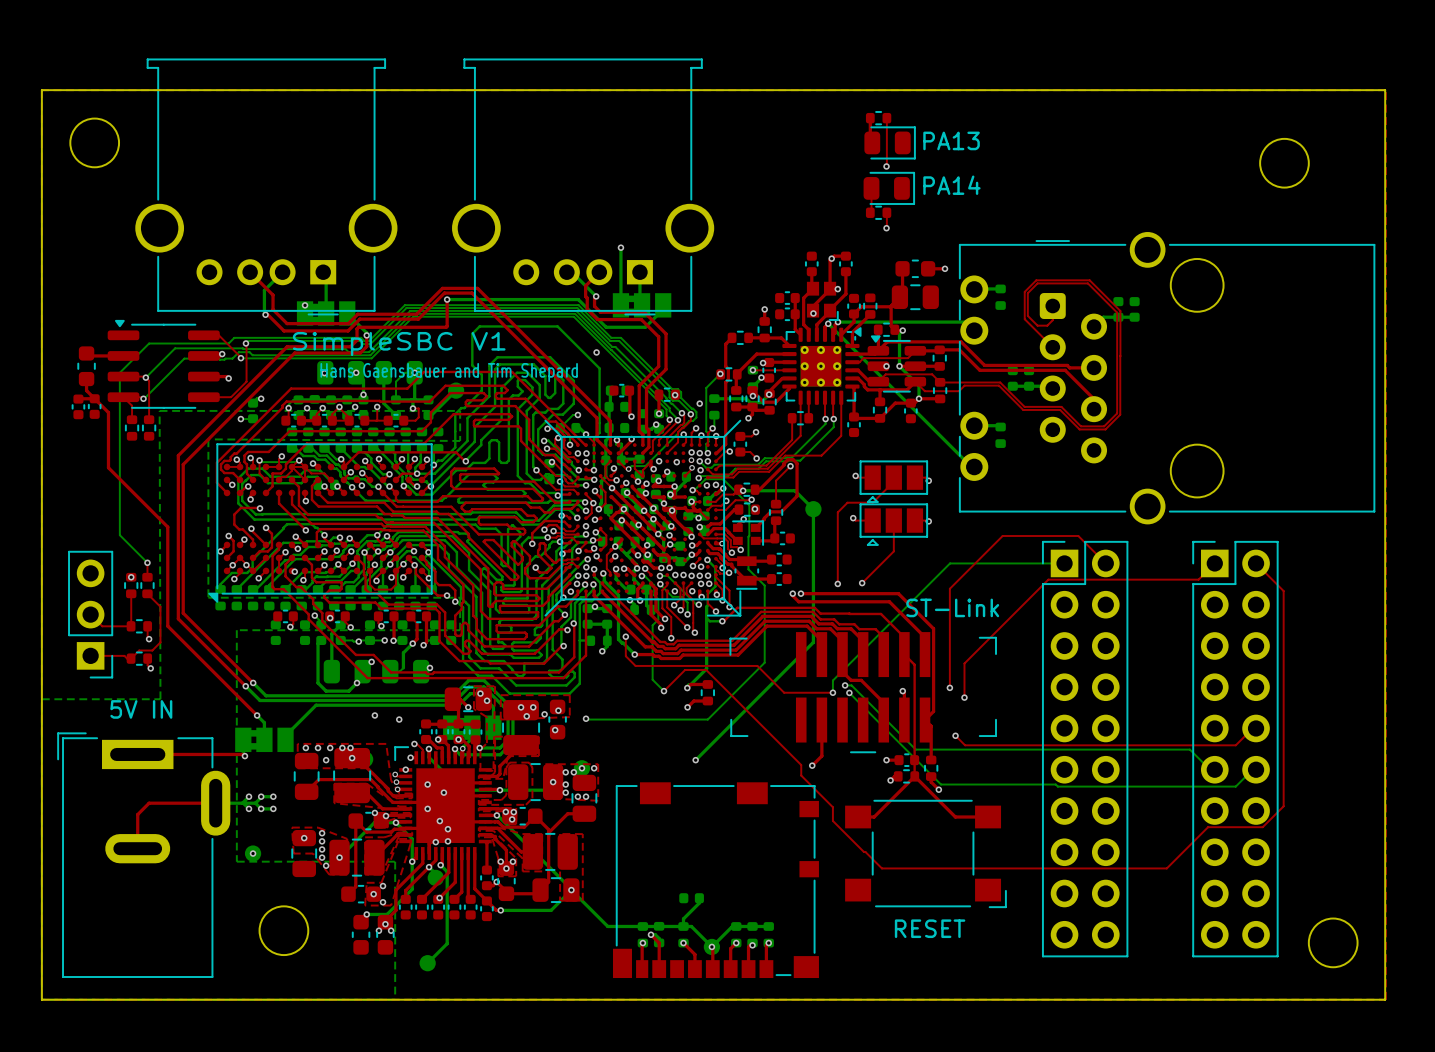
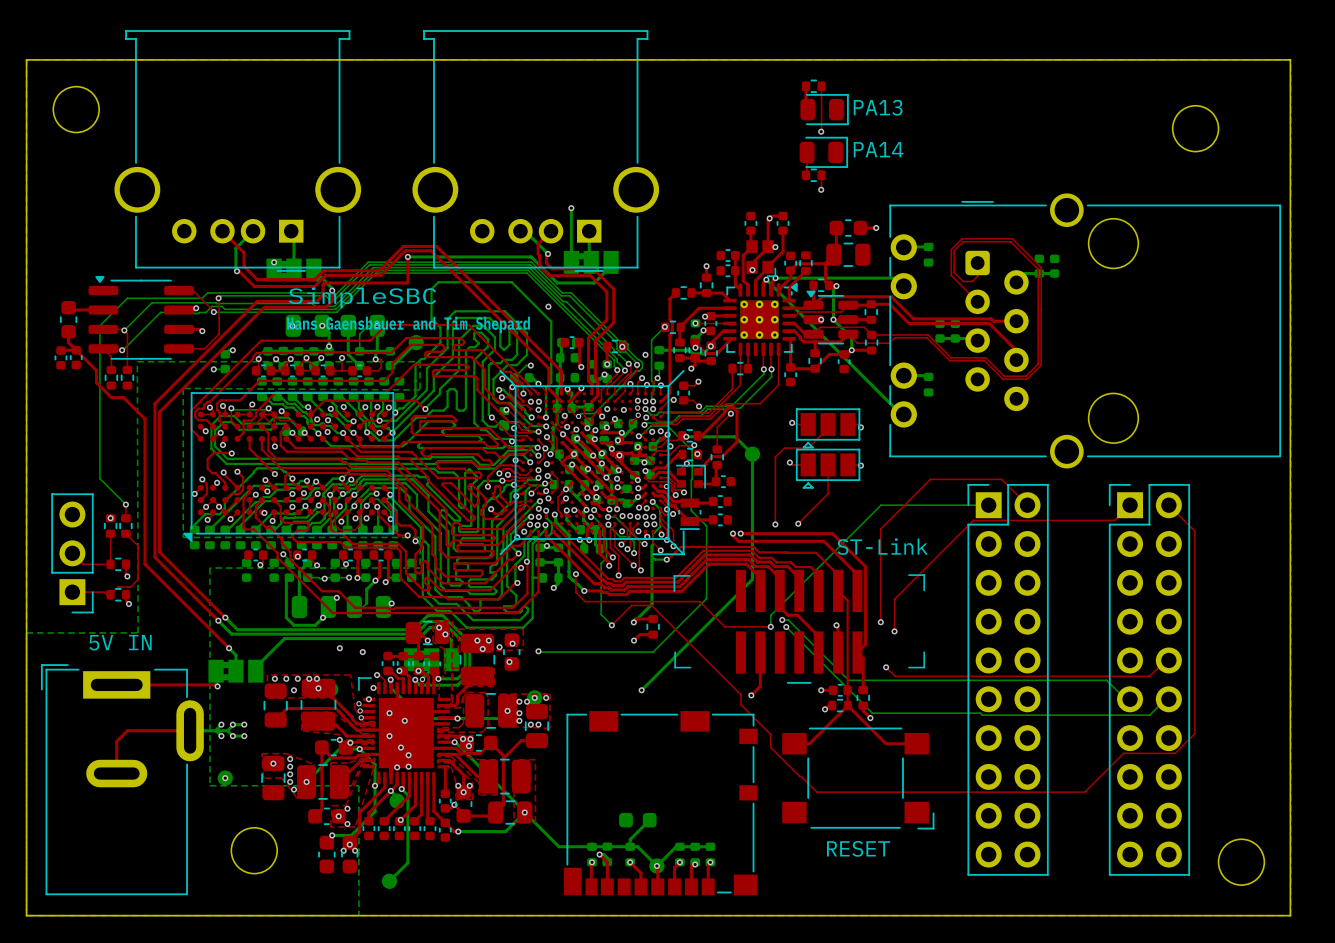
text: SimpleSBC V1 (399, 344) -> SimpleSBC (362, 297)
top track: (108, 412) (108, 467) (167, 527) -> (89, 363) (96, 370) (96, 382) (111, 397) (123, 397) (145, 419) (145, 470)
part footprint: [679, 893, 704, 904] -> [619, 812, 657, 828]

